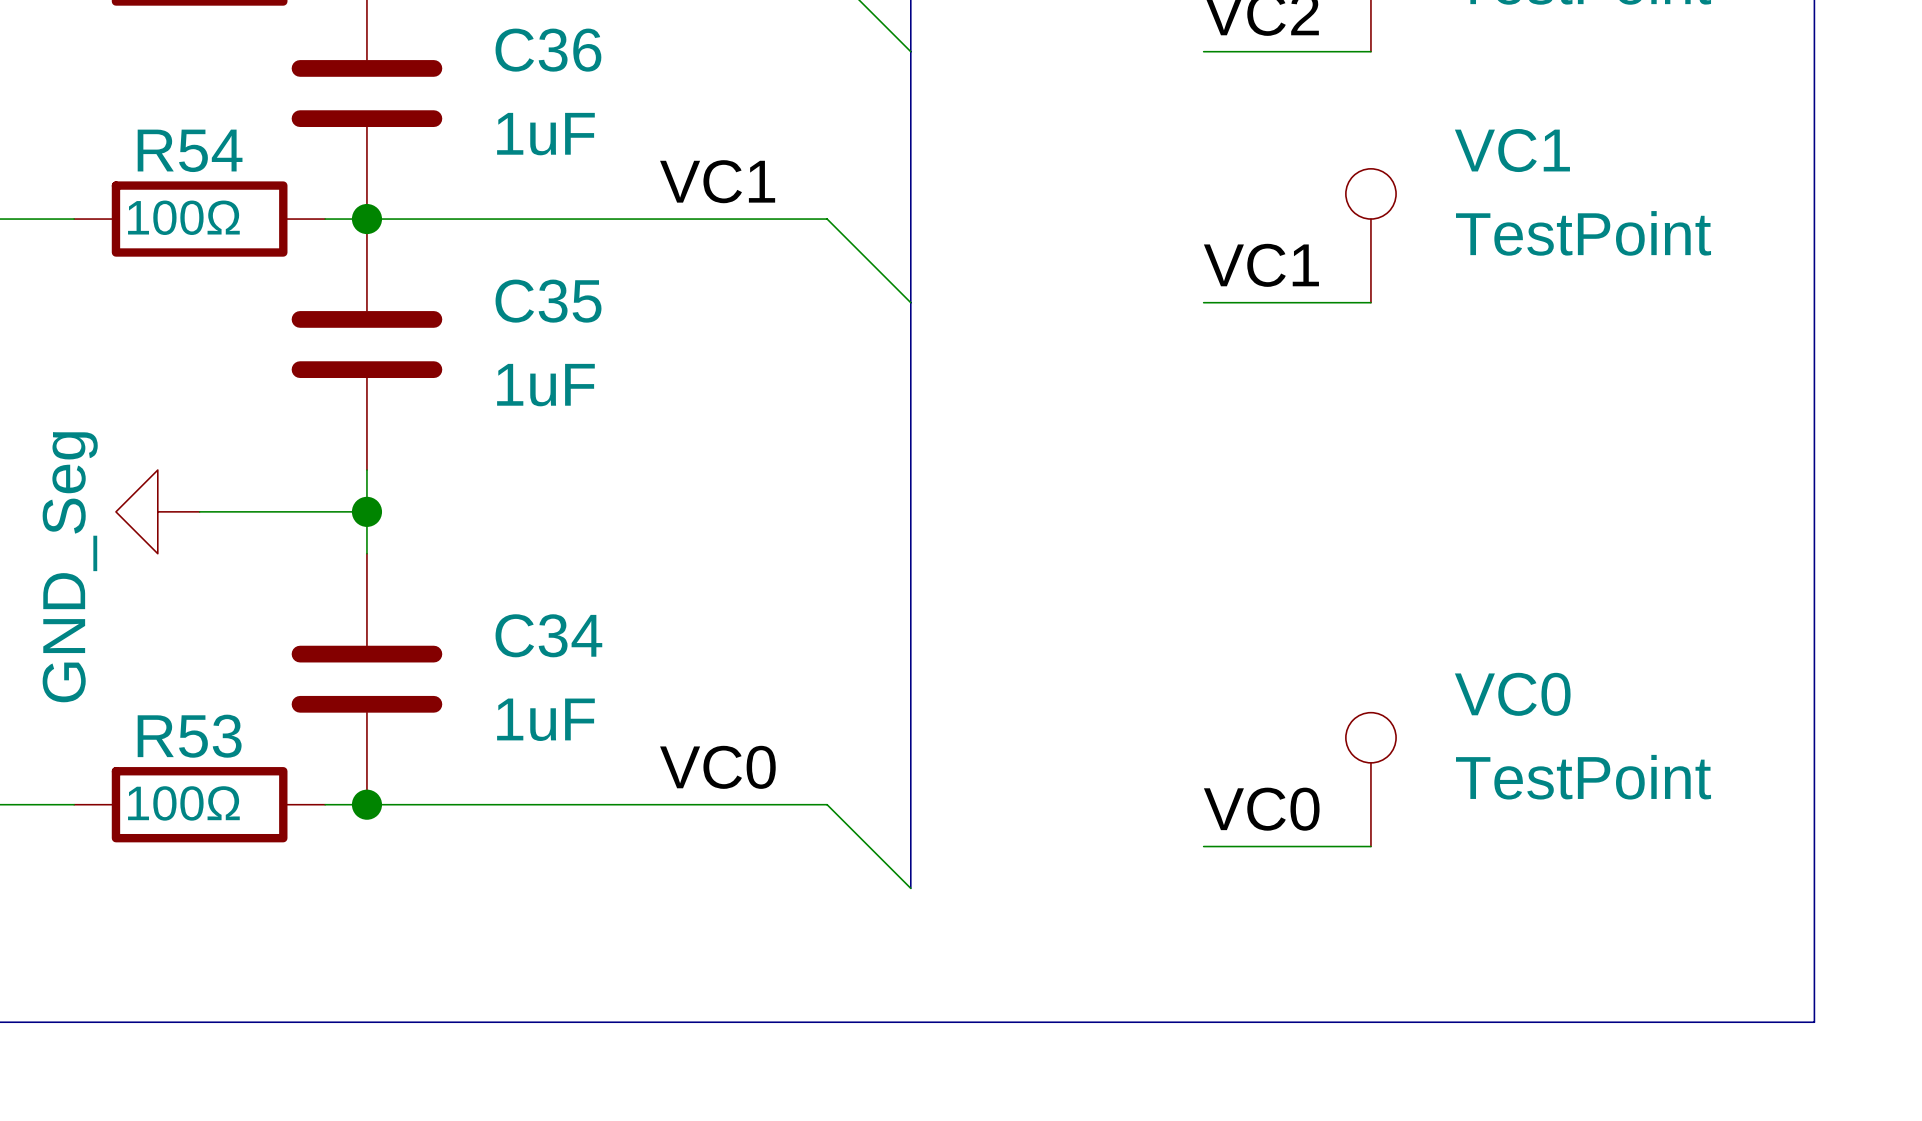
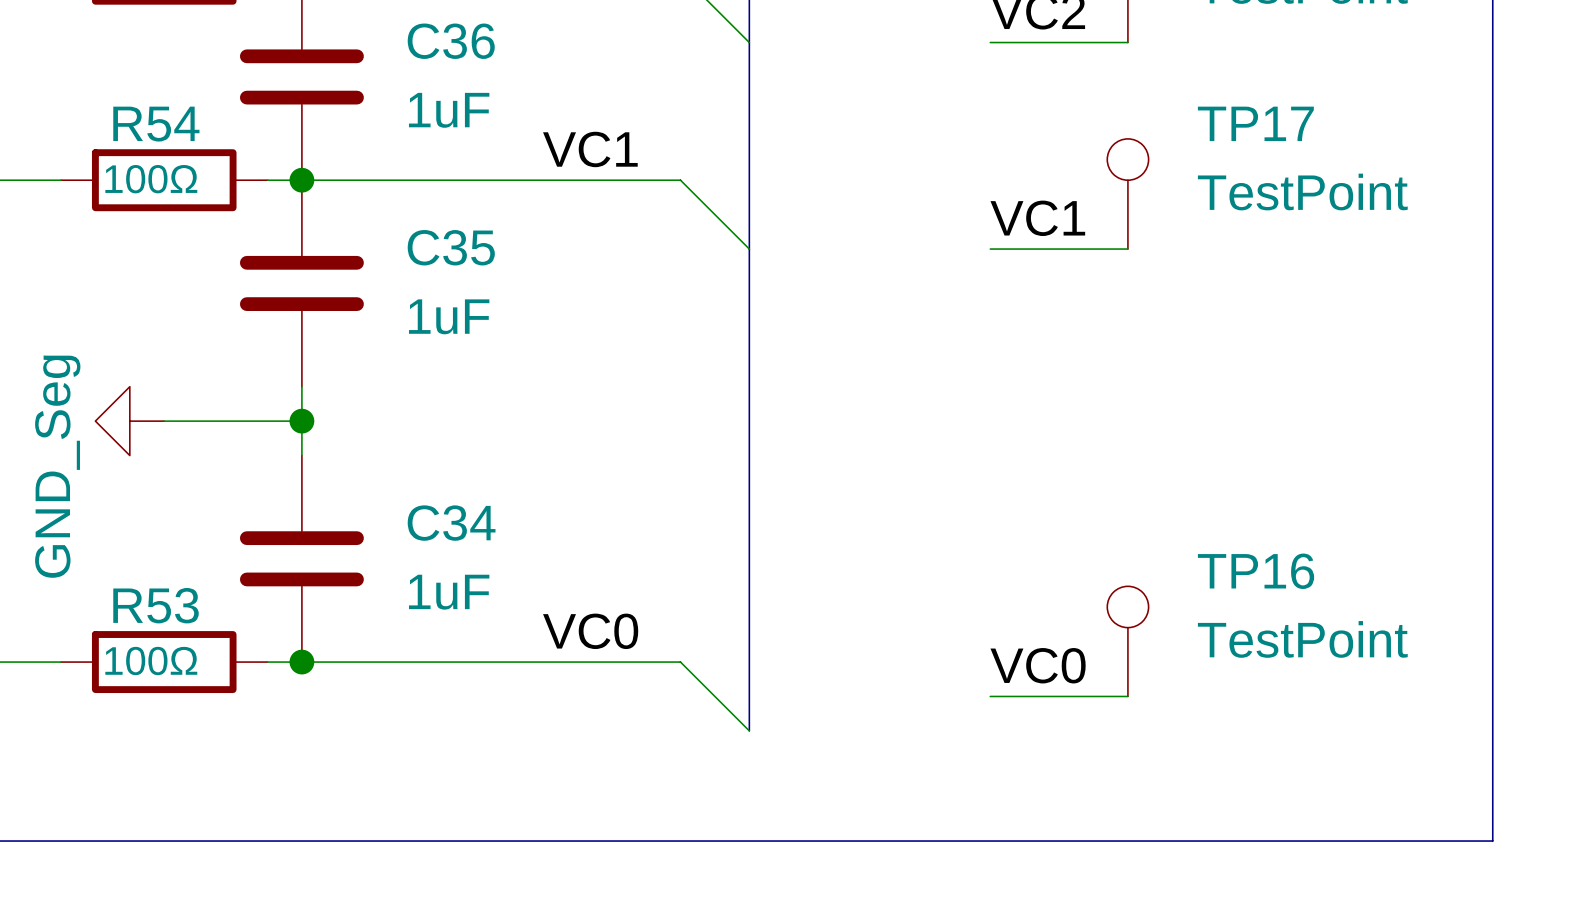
VC1 name: VC1 (1512, 150) -> TP17 (1255, 123)
VC0 name: VC0 (1512, 694) -> TP16 (1256, 571)

